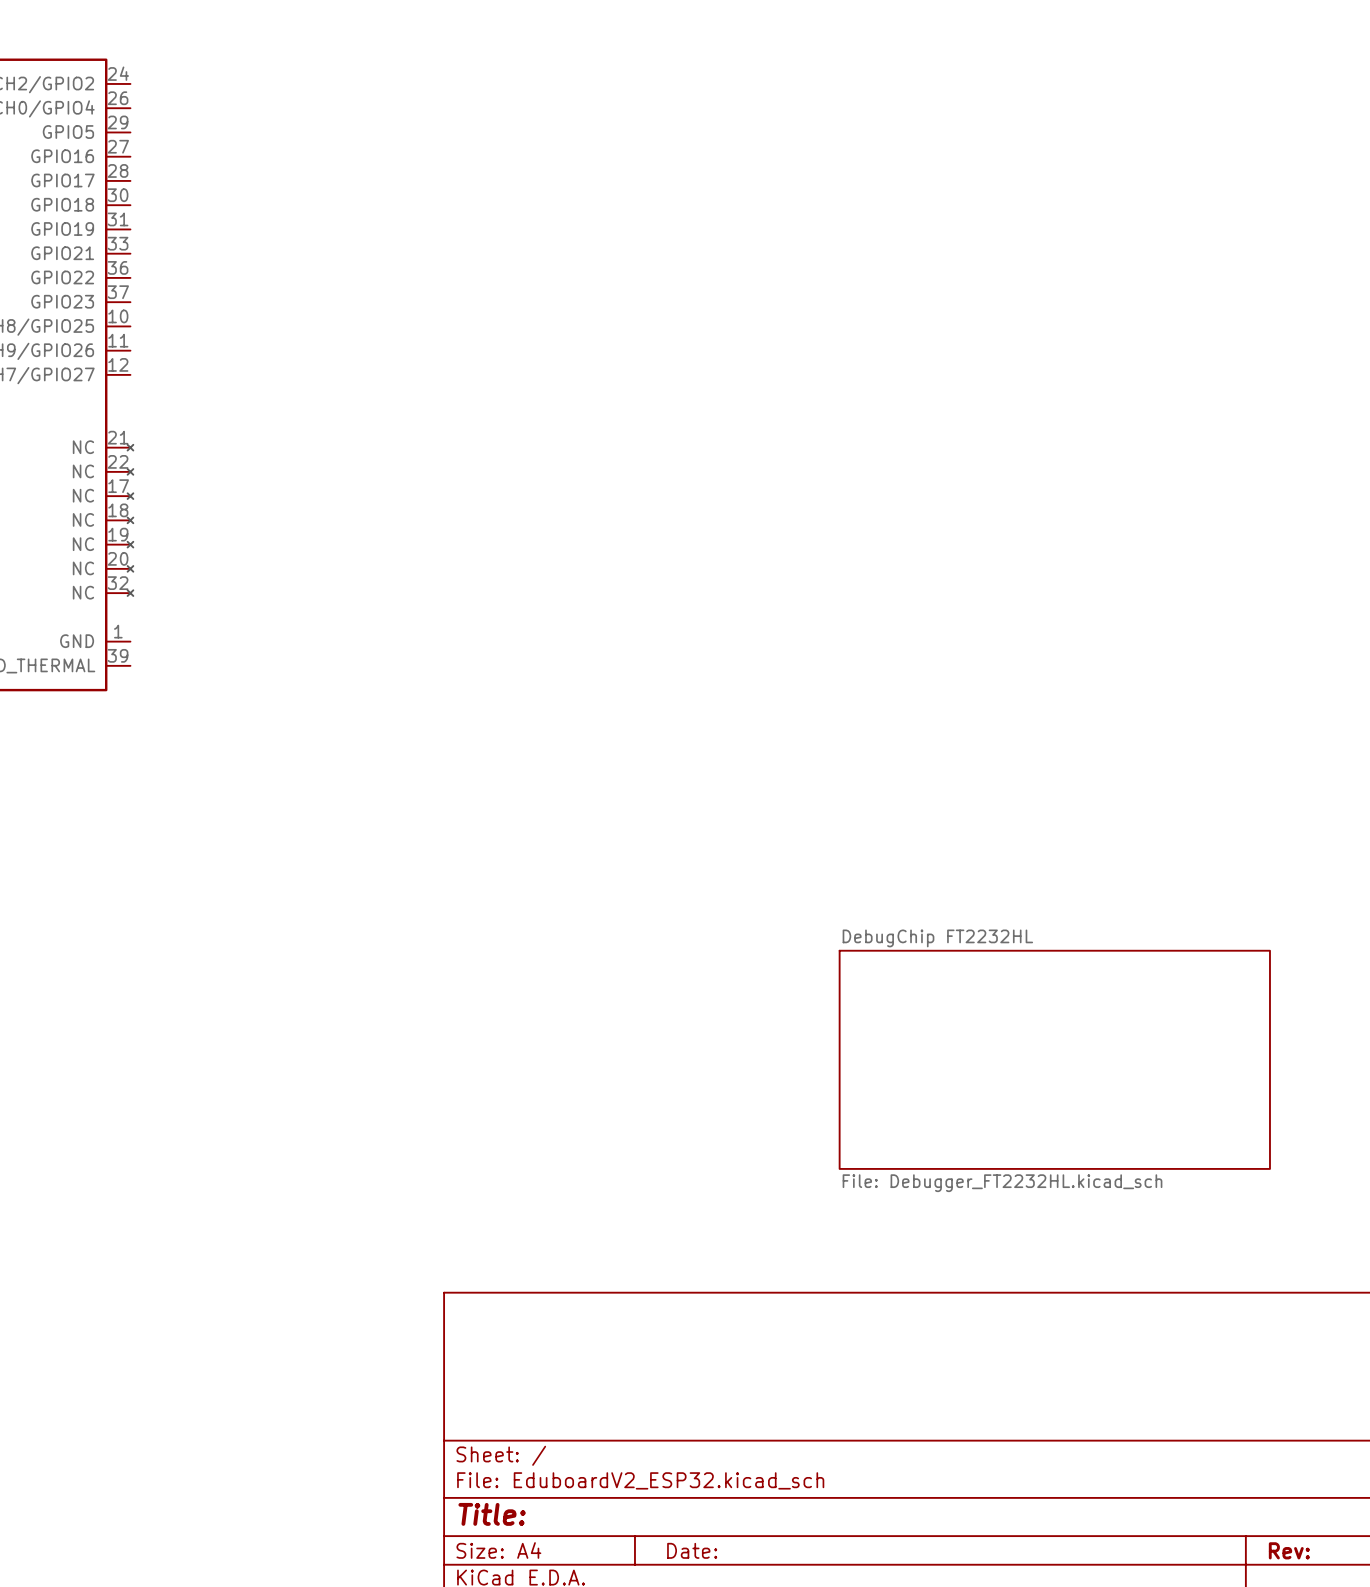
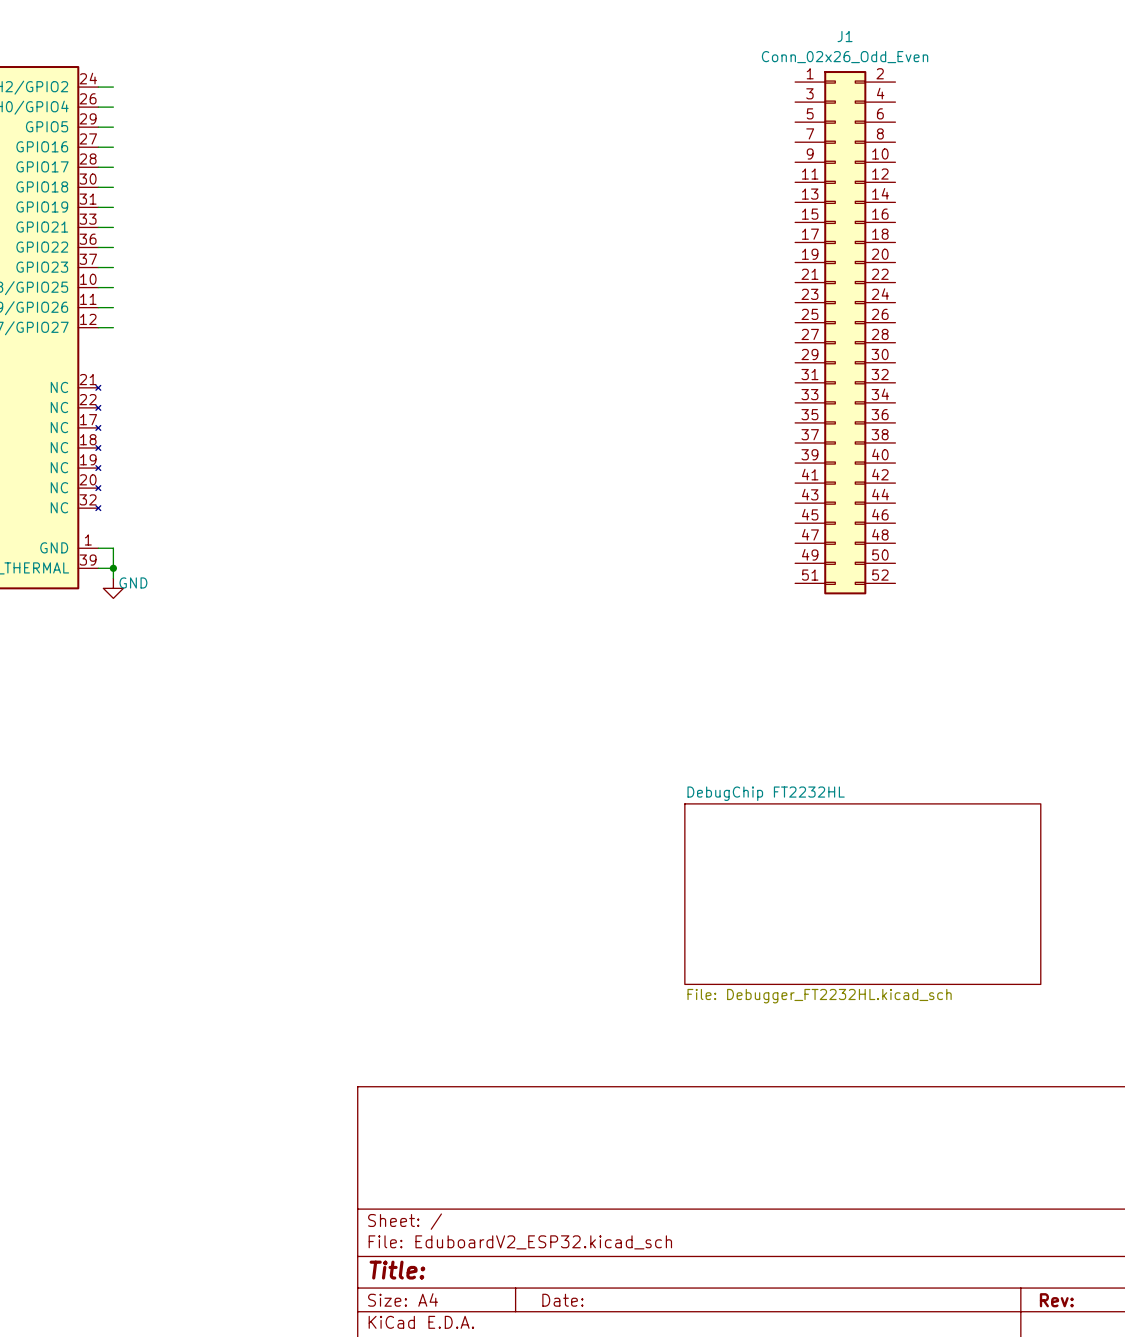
wire: none -> (98, 87) (113, 87)
wire: none -> (98, 107) (113, 107)
wire: none -> (98, 127) (113, 127)
wire: none -> (98, 147) (113, 147)
wire: none -> (98, 167) (113, 167)
wire: none -> (98, 187) (113, 187)
wire: none -> (98, 207) (113, 207)
wire: none -> (98, 227) (113, 227)
wire: none -> (98, 247) (113, 247)
wire: none -> (98, 267) (113, 267)
wire: none -> (98, 287) (113, 287)
wire: none -> (98, 307) (113, 307)
wire: none -> (98, 327) (113, 327)
J1: none -> Conn_02x26_Odd_Even (845, 332)
wire: none -> (98, 548) (113, 548) (113, 578)
wire: none -> (98, 568) (113, 568)
junction: none -> (113, 568)
power symbol: none -> GND (113, 588)

